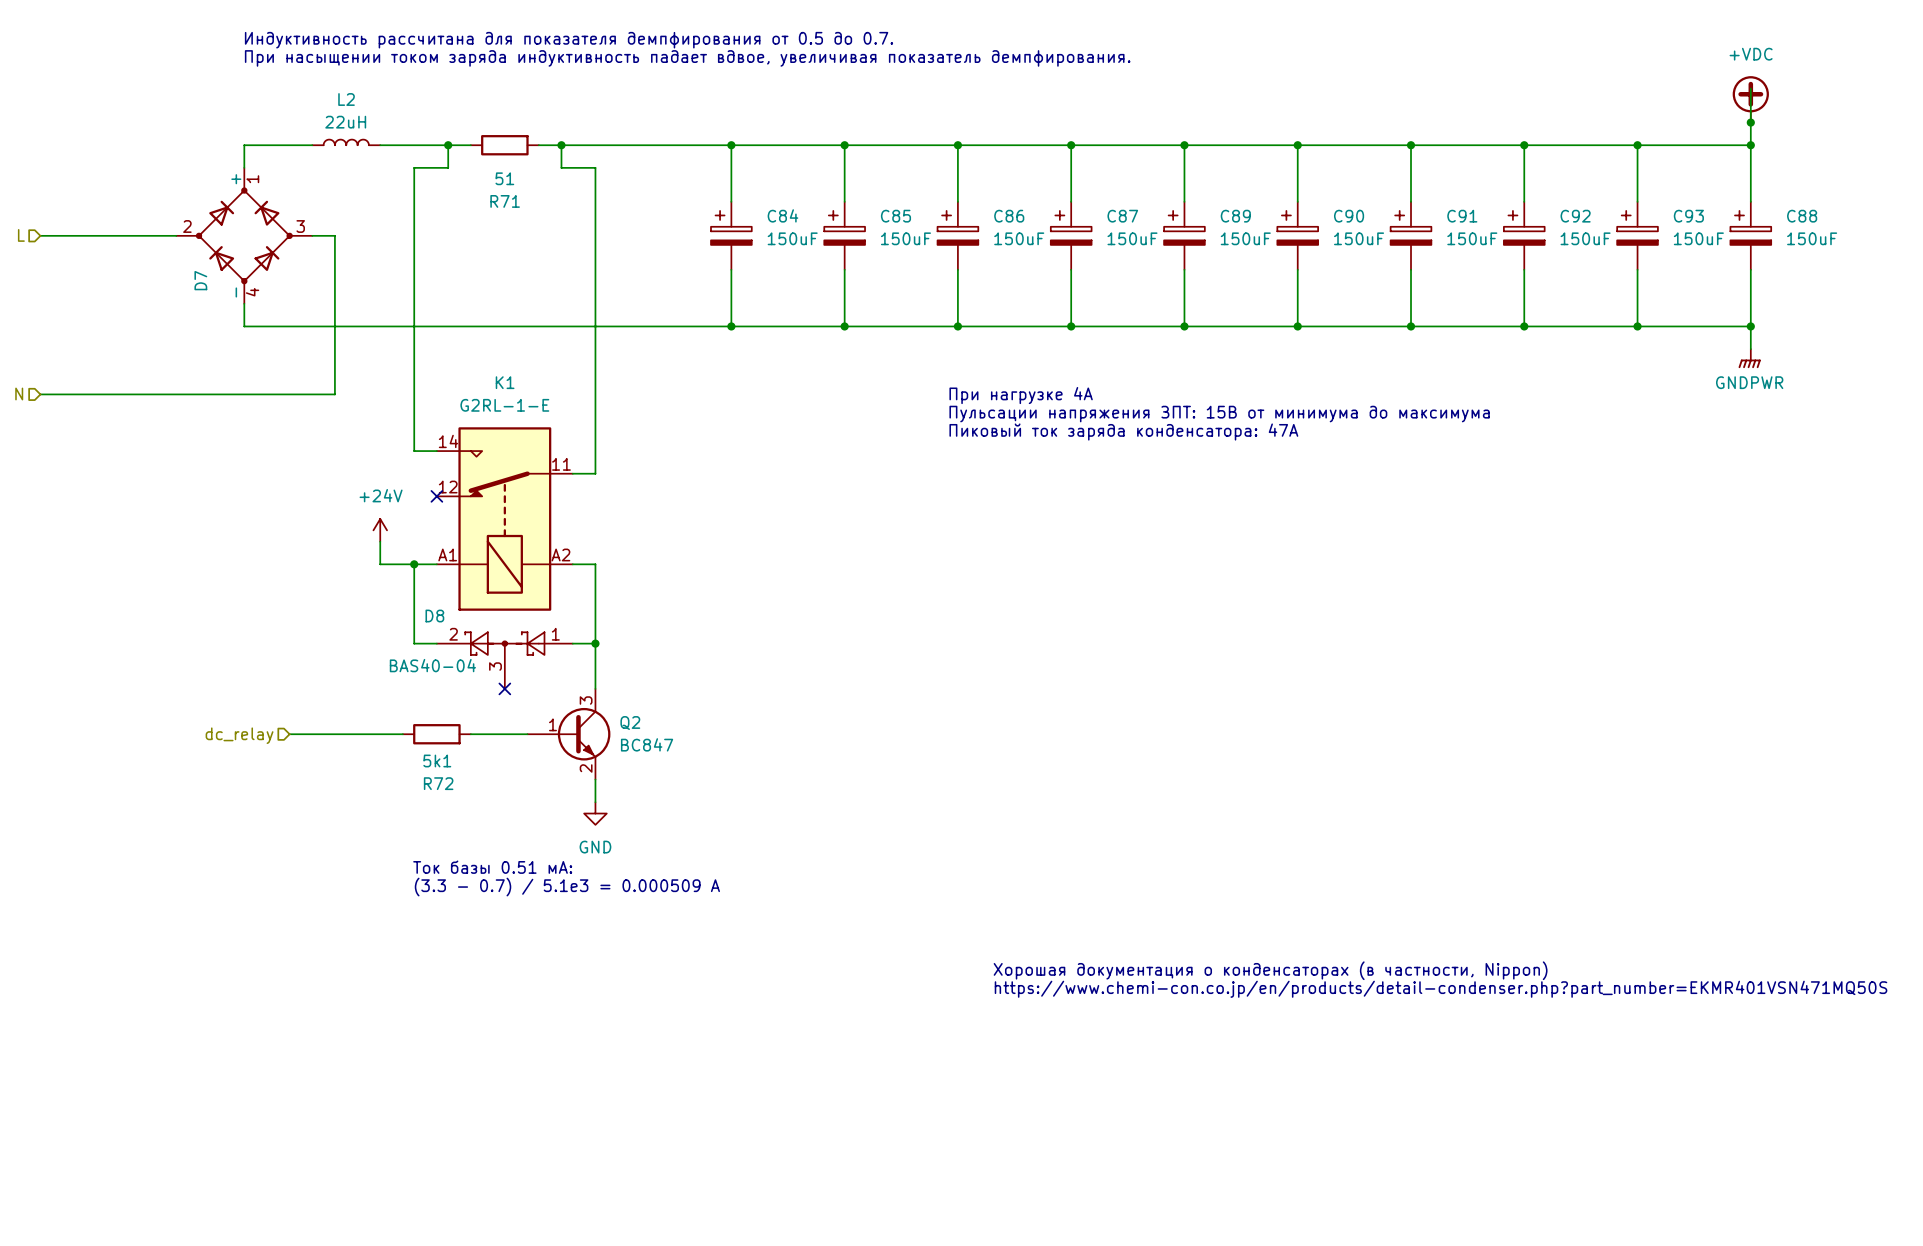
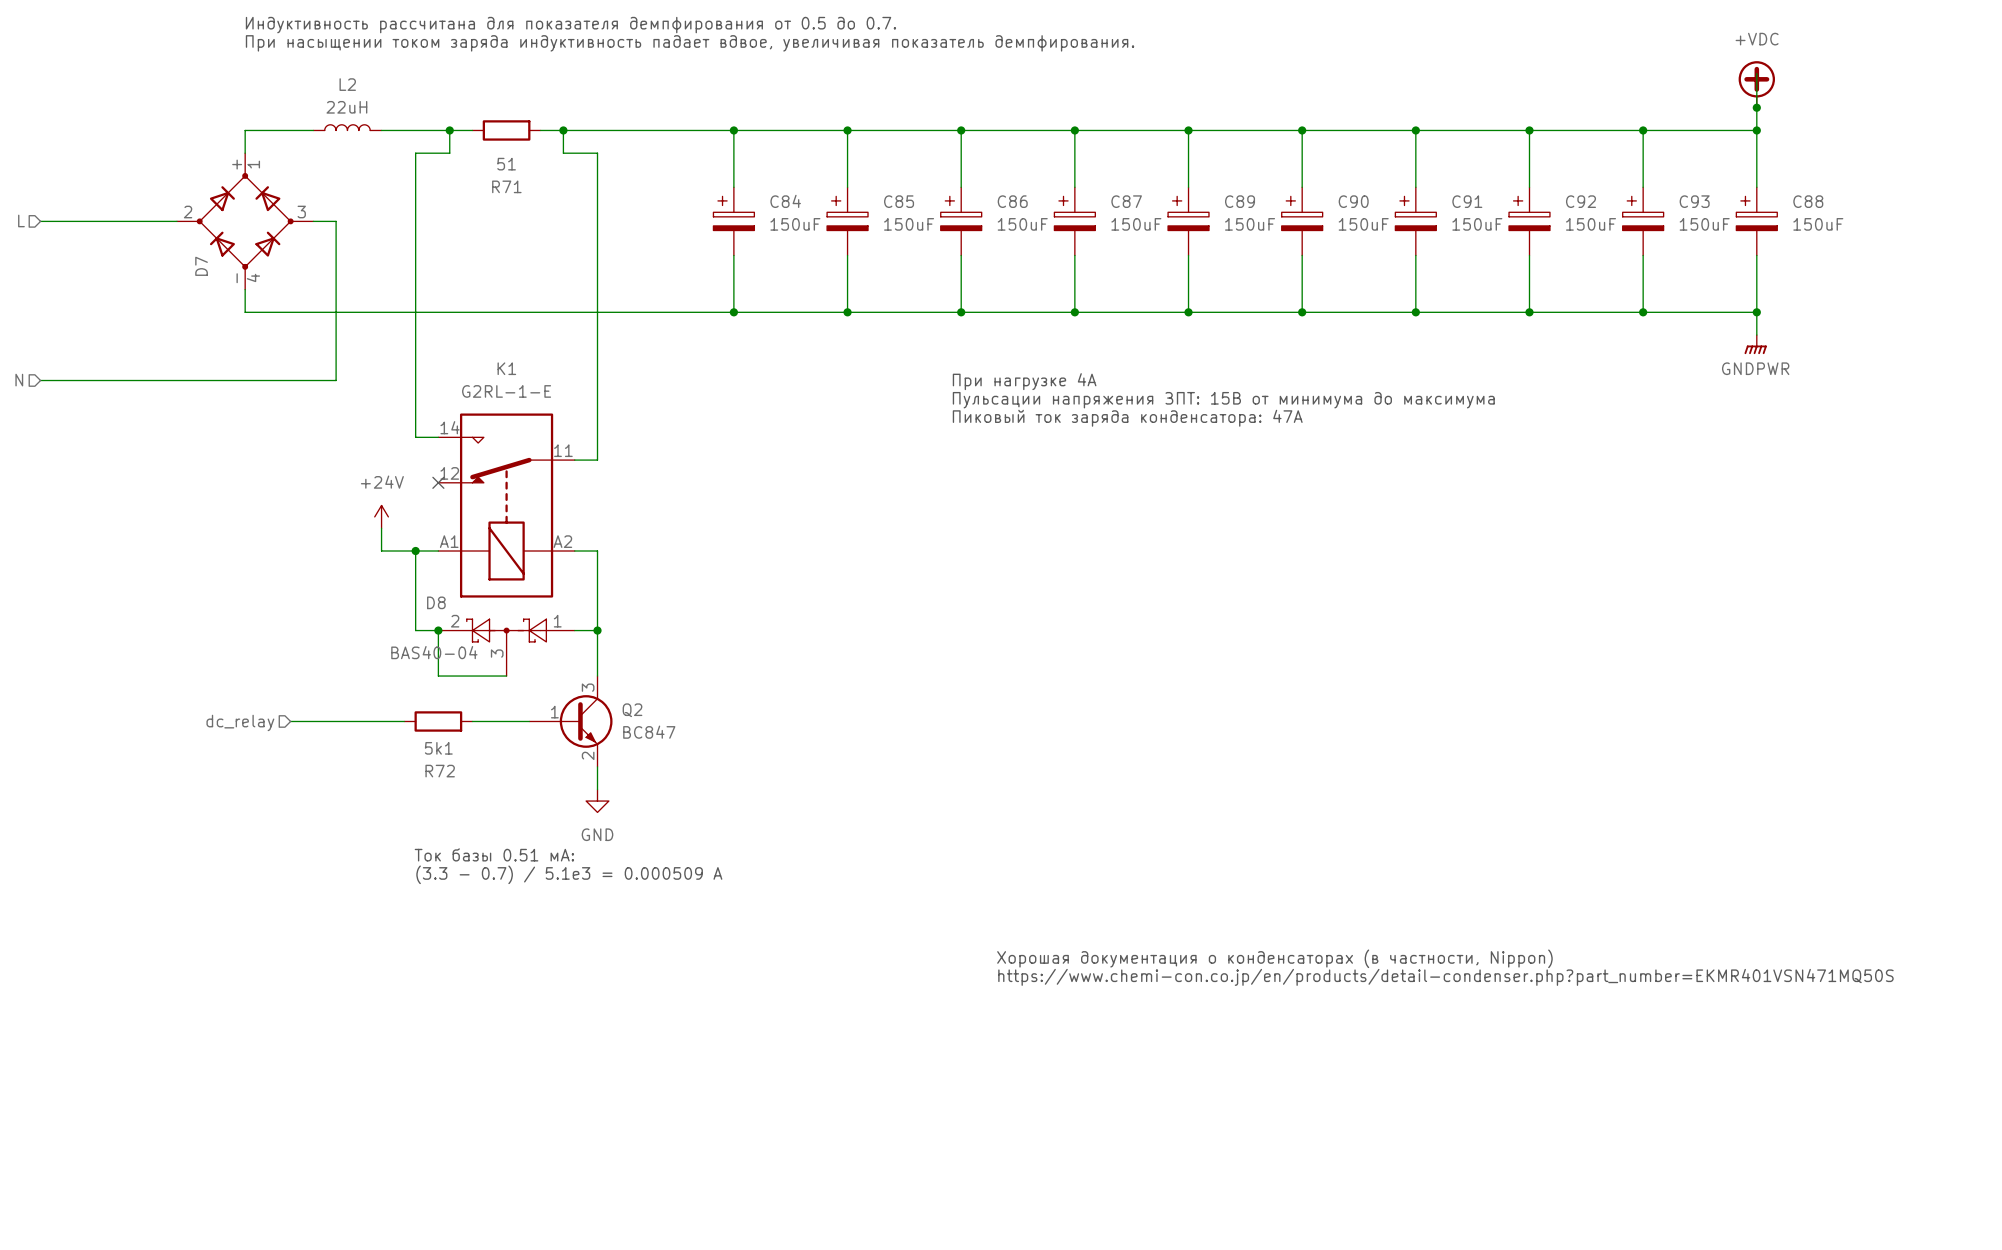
wire: none -> (438, 630) (438, 676) (506, 676)
junction: none -> (438, 630)
no-connect mark: (504, 688) -> none

